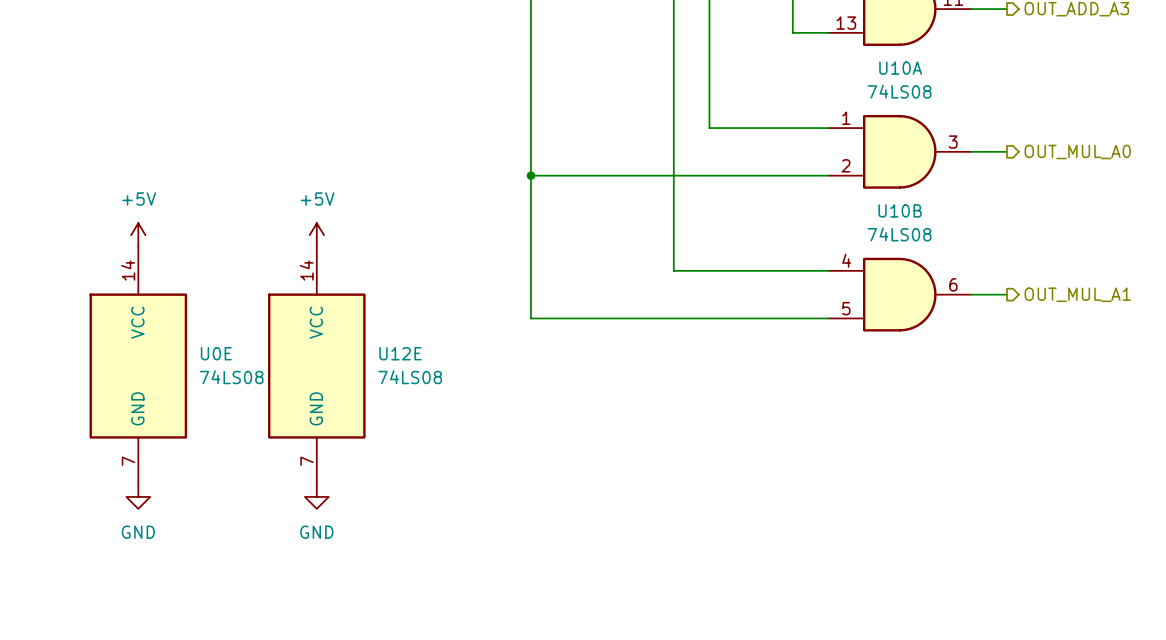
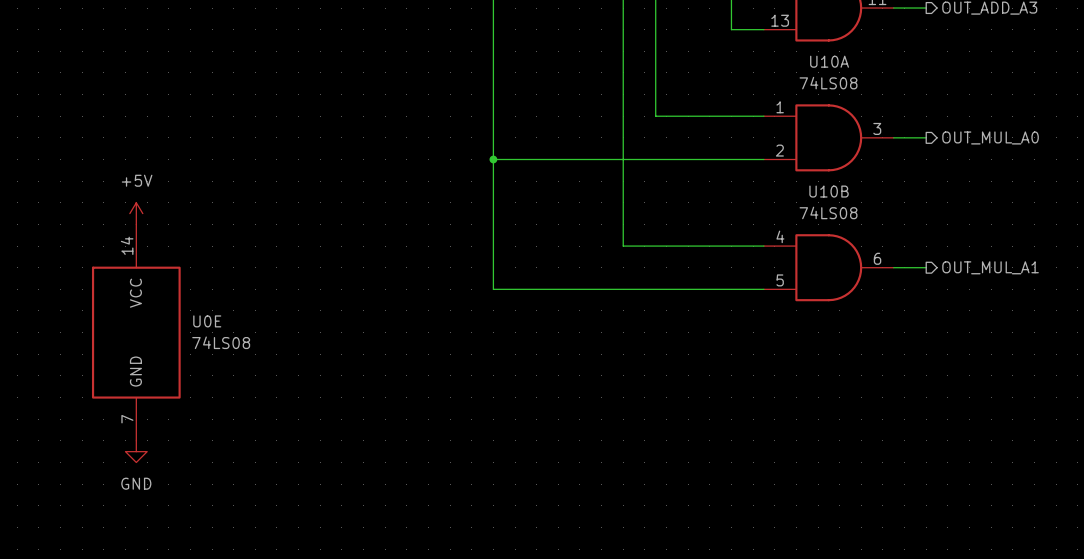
power symbol: +5V (316, 235) -> none
U12E: 74LS08 (316, 366) -> none
power symbol: GND (316, 496) -> none

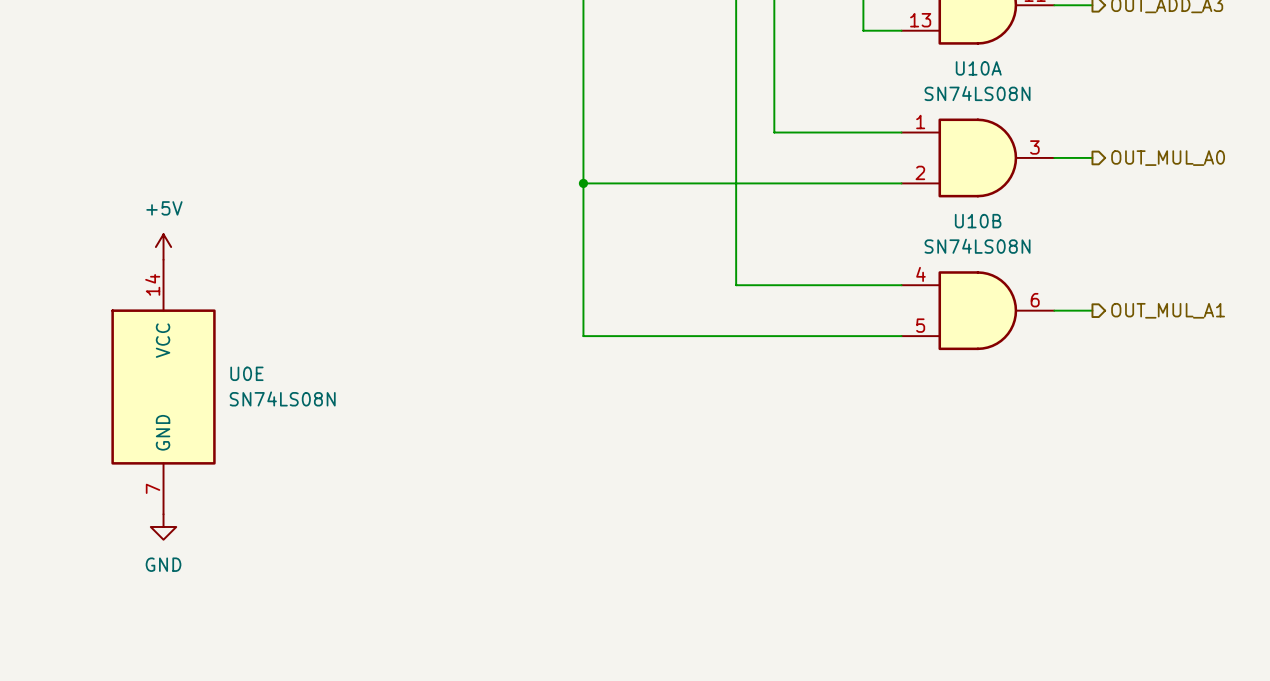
U10A value: 74LS08 (828, 83) -> SN74LS08N (977, 93)
U10B value: 74LS08 (828, 212) -> SN74LS08N (977, 246)
U0E value: 74LS08 (221, 342) -> SN74LS08N (282, 398)

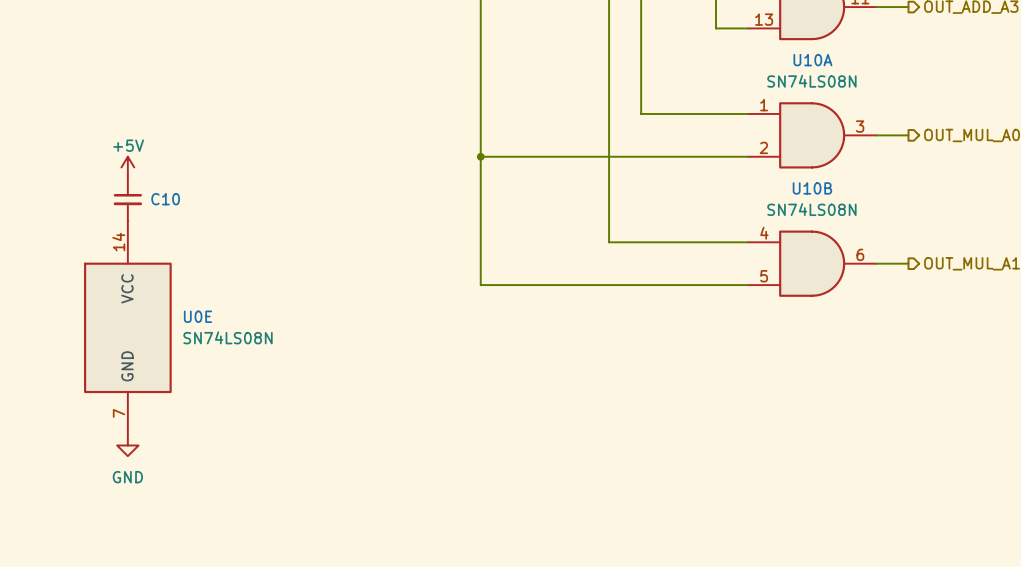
power symbol text position: +5V (164, 208) -> +5V (128, 145)
C10: none -> (127, 199)
power symbol position: +5V (163, 247) -> +5V (127, 167)

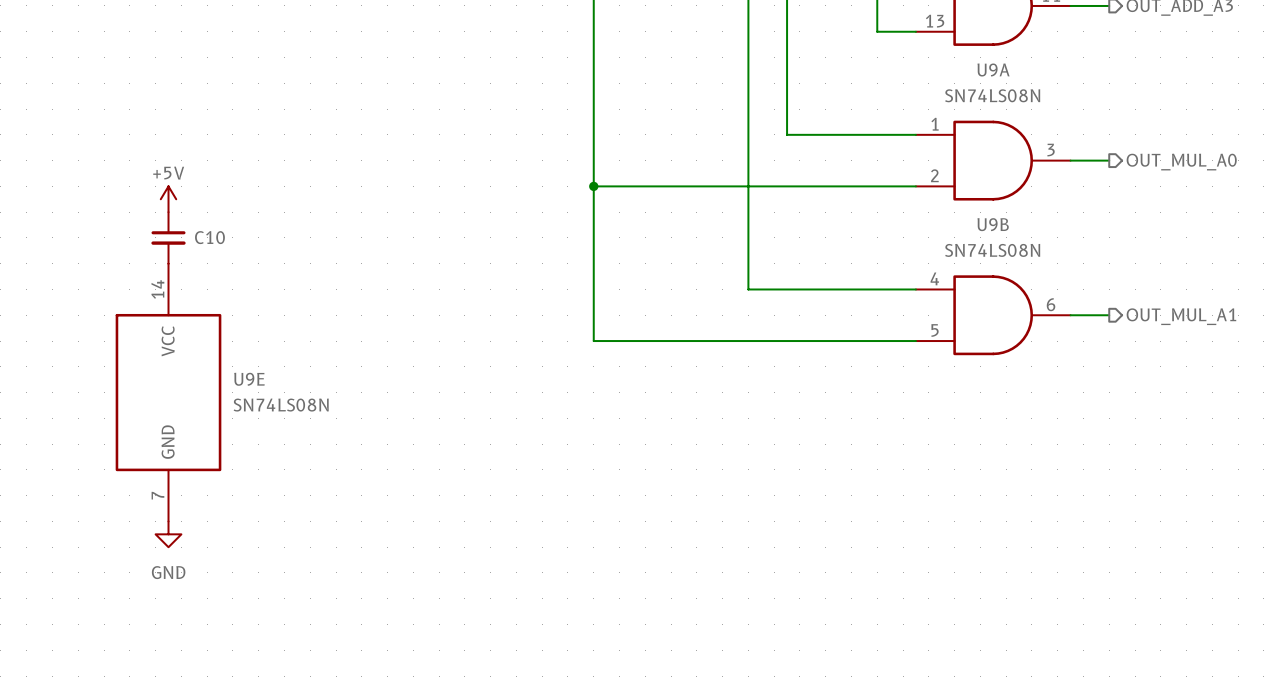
U10A name: U10A (812, 60) -> U9A (993, 70)
U10B name: U10B (812, 188) -> U9B (993, 224)
U0E name: U0E (197, 316) -> U9E (249, 379)

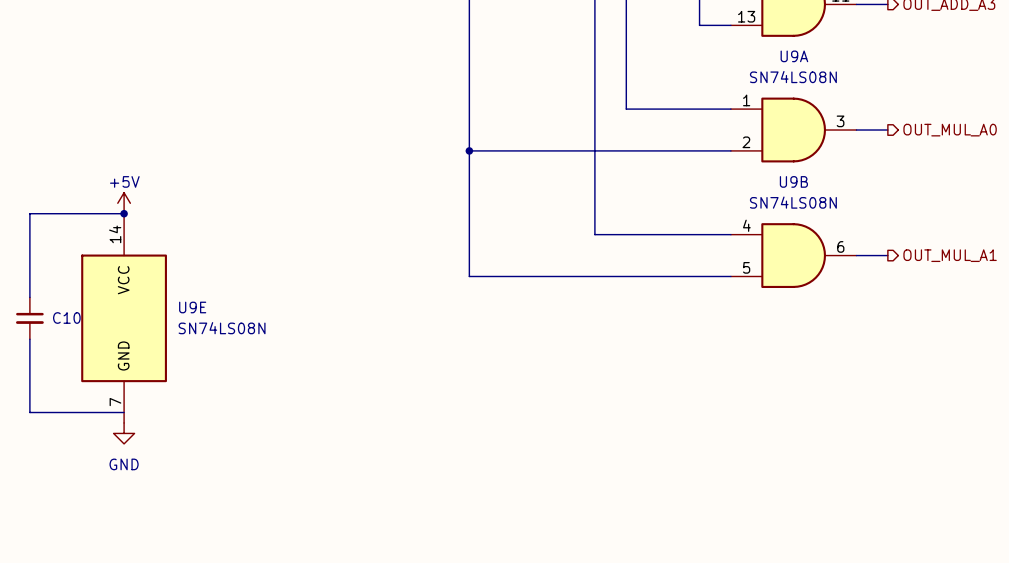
power symbol position: +5V (168, 199) -> +5V (124, 203)
C10 position: (168, 237) -> (29, 318)
wire: none -> (124, 213) (29, 213) (29, 297)
junction: none -> (124, 213)
wire: none -> (29, 339) (29, 412) (124, 412)

